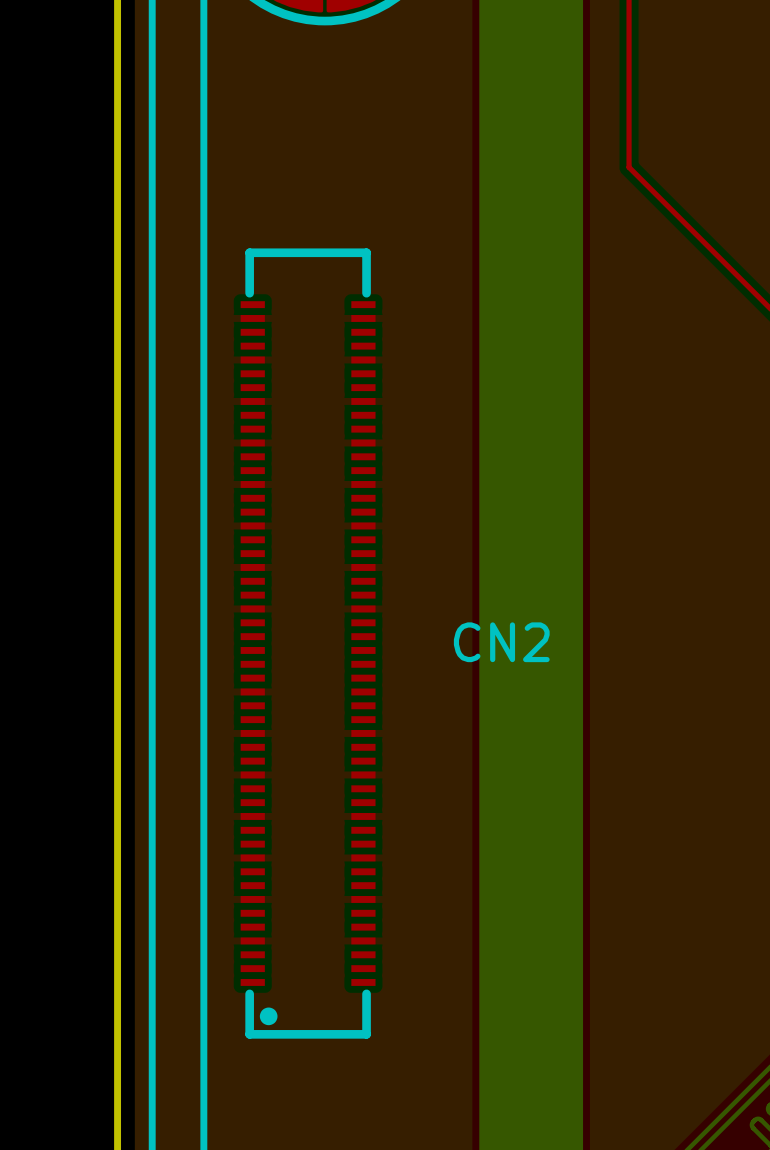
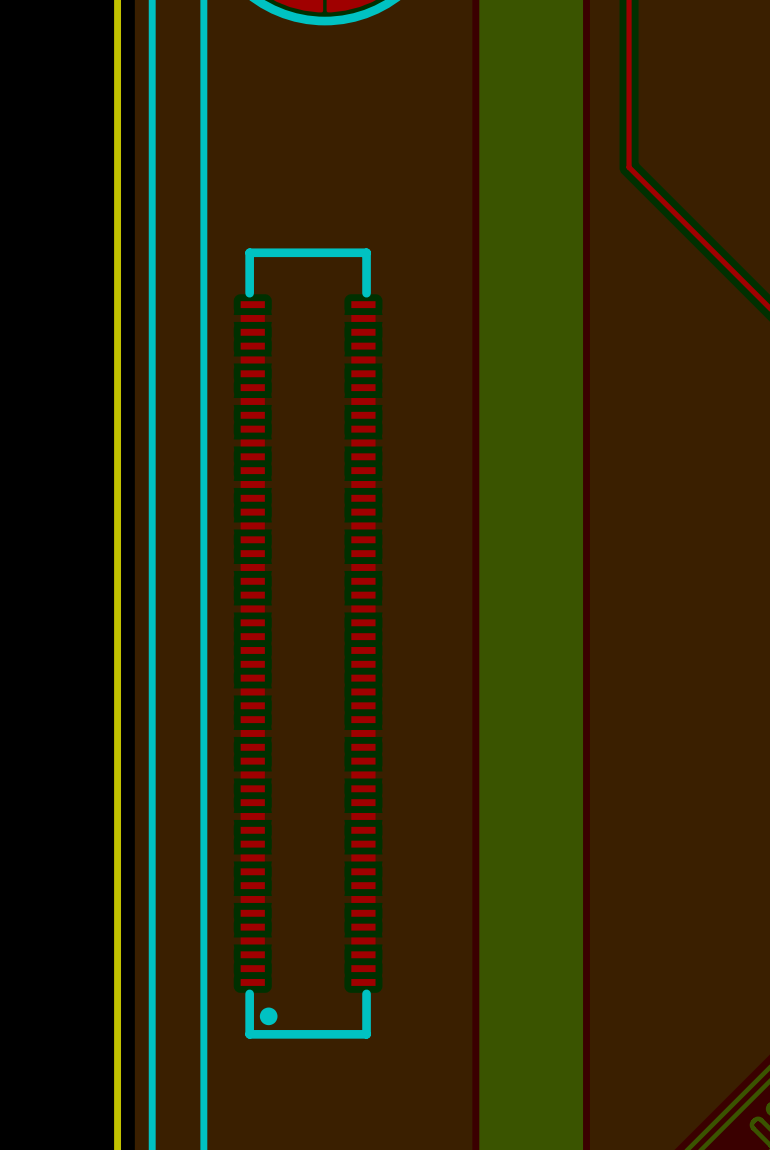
CN2 name: CN2 (501, 642) -> none

